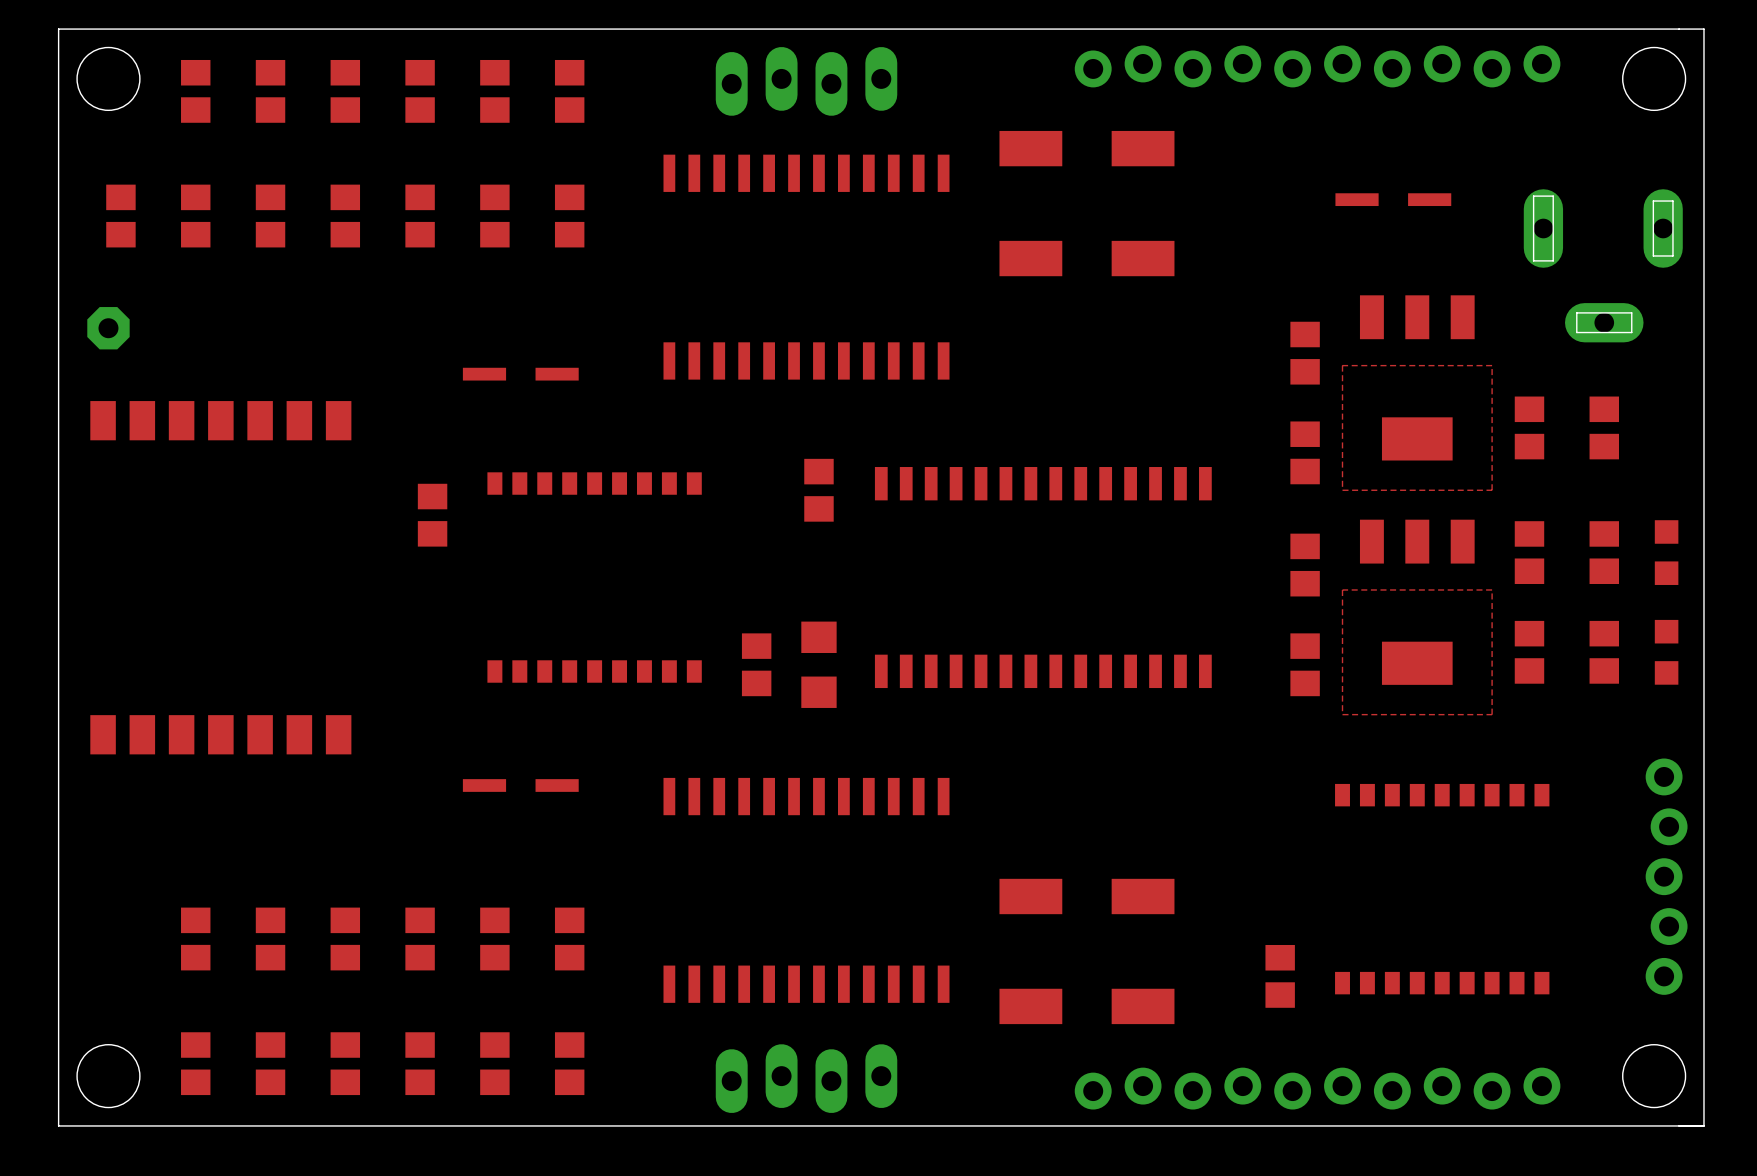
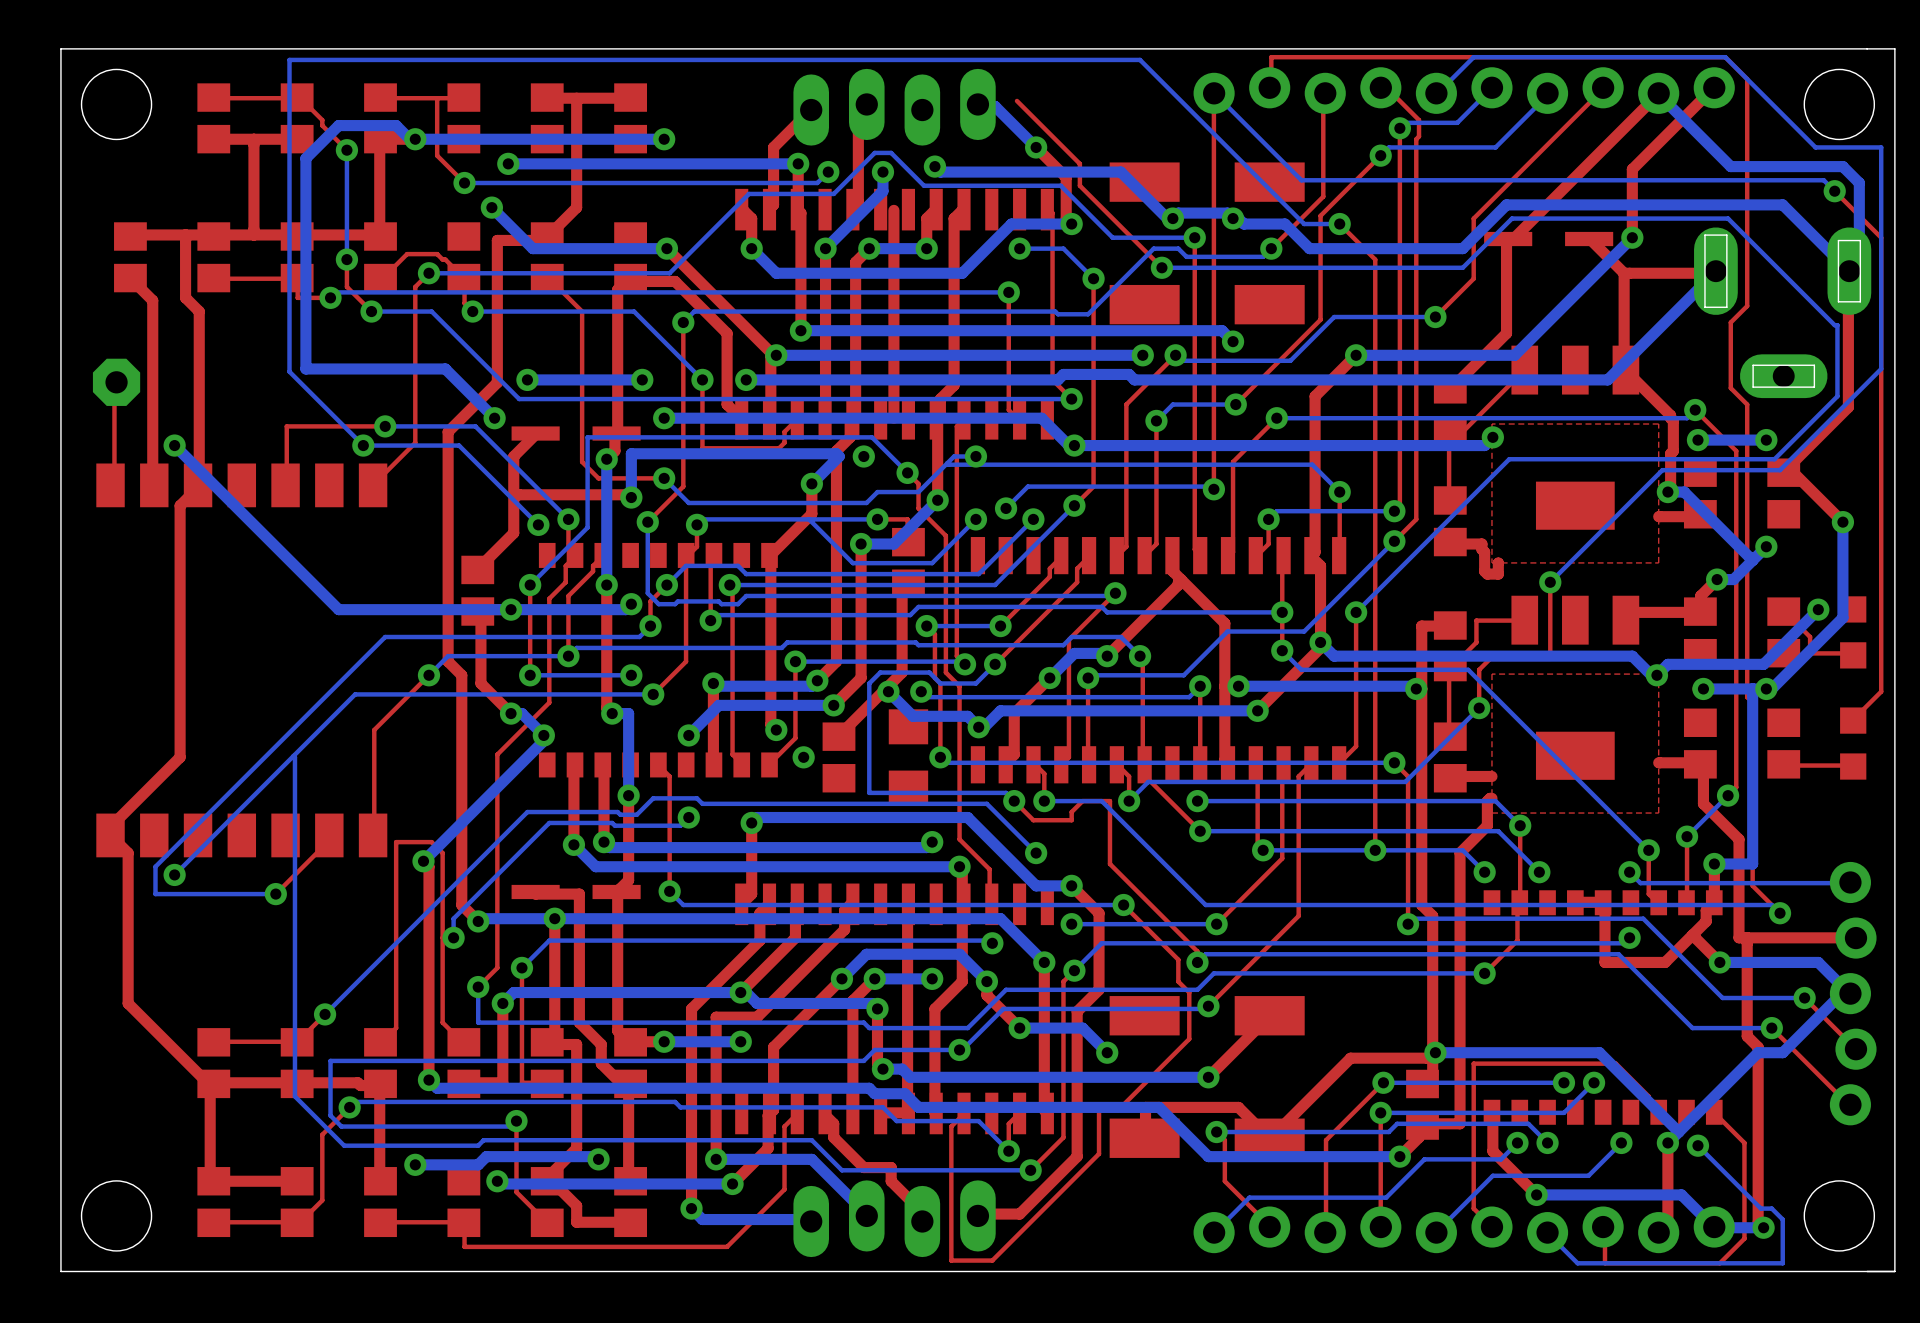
top track: none -> (1269, 87) (1271, 87) (1271, 57) (1725, 57) (1747, 79) (1747, 306) (1730, 322) (1730, 388) (1747, 404) (1747, 697) (1752, 702) (1752, 885) (1780, 913)
top track: none -> (1380, 87) (1388, 90) (1419, 120) (1419, 136) (1416, 139) (1416, 519) (1394, 541)
bottom track: none -> (1491, 87) (1457, 122) (1405, 122) (1399, 128)
top track: none -> (1603, 87) (1473, 218) (1473, 278) (1435, 317)
top track: none -> (1714, 87) (1632, 169) (1632, 237)
bottom track: none -> (1214, 93) (1301, 180) (1823, 180) (1834, 191)
top track: none -> (1214, 93) (1213, 489)
top track: none -> (1325, 93) (1323, 95) (1323, 196) (1271, 248)
bottom track: none -> (1436, 93) (1473, 57) (1725, 57) (1815, 147) (1881, 147) (1881, 368) (1780, 470) (1662, 470) (1550, 582)
bottom track: none -> (1547, 93) (1495, 147) (1388, 147) (1380, 155)
bottom track: none -> (1658, 93) (1730, 166) (1842, 166) (1859, 183) (1859, 267) (1848, 270) (1782, 204) (1506, 204) (1462, 248) (1309, 248) (1285, 224) (1243, 224) (1238, 218) (1233, 218) (1227, 213) (1178, 213) (1172, 218) (1167, 218) (1120, 172) (940, 172) (934, 166)
top track: none -> (1658, 93) (1512, 240) (1506, 240) (1506, 333) (1450, 389)
top track: none -> (213, 97) (294, 98) (297, 95) (322, 120) (322, 125) (346, 150)
top track: none -> (463, 97) (380, 97)
top track: none -> (630, 97) (547, 97)
top track: none -> (437, 98) (437, 155) (464, 183)
top track: none -> (576, 98) (576, 207) (543, 240) (497, 240) (497, 382) (448, 431) (448, 661) (461, 675) (461, 905) (478, 921)
top track: none -> (1016, 100) (1079, 163) (1079, 185) (1161, 267)
top track: none -> (866, 104) (858, 114) (858, 202) (852, 209)
bottom track: none -> (977, 104) (978, 106) (995, 106) (1036, 147)
top track: none -> (811, 110) (773, 147) (773, 204) (769, 209)
top track: none -> (1399, 128) (1399, 505) (1394, 511)
via: none -> (1399, 128)
top track: none -> (253, 139) (253, 234)
top track: none -> (297, 139) (213, 139)
top track: none -> (415, 139) (379, 139) (380, 236) (379, 234) (297, 234) (297, 236) (130, 234) (130, 236)
via: none -> (415, 139)
bottom track: none -> (664, 139) (409, 139) (396, 125) (338, 125) (305, 158) (305, 368) (445, 368) (494, 418)
via: none -> (664, 139)
top track: none -> (1036, 147) (1066, 177) (1066, 218) (1071, 224)
via: none -> (1036, 147)
bottom track: none -> (346, 150) (346, 259)
via: none -> (346, 150)
top track: none -> (1380, 155) (1320, 215) (1320, 319) (1235, 404)
via: none -> (1380, 155)
via: none -> (508, 163)
bottom track: none -> (798, 163) (508, 163)
top track: none -> (798, 163) (797, 209) (800, 213) (800, 330)
via: none -> (798, 163)
via: none -> (934, 166)
bottom track: none -> (828, 172) (817, 183) (464, 183)
via: none -> (828, 172)
bottom track: none -> (882, 172) (882, 191) (825, 248)
via: none -> (882, 172)
via: none -> (464, 183)
top track: none -> (1834, 191) (1881, 237) (1881, 691) (1853, 720)
via: none -> (1834, 191)
bottom track: none -> (491, 207) (532, 248) (666, 248)
via: none -> (491, 207)
top track: none -> (741, 209) (751, 218) (751, 248)
top track: none -> (893, 210) (893, 418)
top track: none -> (936, 209) (926, 218) (926, 248)
top track: none -> (964, 209) (954, 218) (954, 385) (940, 399) (940, 415) (936, 418) (937, 500)
top track: none -> (1047, 209) (1052, 213) (1052, 379) (1071, 399)
via: none -> (1172, 218)
via: none -> (1233, 218)
bottom track: none -> (1071, 224) (1011, 224) (962, 273) (776, 273) (751, 248)
via: none -> (1071, 224)
bottom track: none -> (1339, 224) (1304, 224) (1140, 59) (289, 59) (289, 371) (363, 445) (459, 445) (538, 524)
top track: none -> (1339, 224) (1375, 259) (1375, 850)
via: none -> (1339, 224)
top track: none -> (185, 234) (185, 297) (199, 311) (199, 483) (196, 489) (180, 505) (180, 757) (111, 825) (110, 835) (128, 853) (128, 1003) (210, 1085) (213, 1083)
bottom track: none -> (1194, 237) (1112, 237) (1060, 185) (923, 185) (891, 152) (874, 152) (833, 193) (748, 193) (669, 273) (428, 273)
top track: none -> (1194, 237) (1194, 549) (1200, 555)
via: none -> (1194, 237)
bottom track: none -> (1632, 237) (1514, 355) (1356, 355)
via: none -> (1632, 237)
top track: none -> (1589, 239) (1624, 273)
top track: none -> (666, 248) (770, 352) (769, 418)
via: none -> (666, 248)
via: none -> (751, 248)
top track: none -> (825, 248) (825, 418)
via: none -> (825, 248)
top track: none -> (869, 248) (855, 262) (855, 415) (850, 420) (850, 437) (836, 451) (836, 661) (817, 680)
via: none -> (869, 248)
bottom track: none -> (926, 248) (869, 248)
via: none -> (926, 248)
bottom track: none -> (1019, 248) (1063, 248) (1093, 278)
via: none -> (1019, 248)
bottom track: none -> (1271, 248) (1263, 256) (1186, 256) (1178, 248) (1153, 248) (1088, 314) (1058, 314) (1055, 311) (694, 311) (683, 322)
via: none -> (1271, 248)
top track: none -> (346, 259) (346, 286) (371, 311)
via: none -> (346, 259)
bottom track: none -> (1161, 267) (1462, 267) (1512, 218) (1728, 218) (1834, 325) (1837, 325) (1837, 396) (1774, 459) (1509, 459) (1356, 612)
via: none -> (1161, 267)
bottom track: none -> (1715, 271) (1607, 379) (1134, 379) (1129, 374) (1063, 374) (1058, 379) (746, 379)
top track: none -> (1715, 271) (1714, 273) (1624, 273)
top track: none -> (1849, 271) (1848, 407) (1783, 472) (1790, 470) (1842, 522)
top track: none -> (428, 273) (415, 286) (415, 442) (373, 485)
via: none -> (428, 273)
top track: none -> (1624, 273) (1624, 368) (1670, 415) (1673, 420) (1670, 489) (1667, 492)
top track: none -> (130, 278) (152, 300) (152, 483) (154, 485)
top track: none -> (213, 278) (297, 278) (297, 297) (330, 297)
top track: none -> (380, 278) (382, 278) (407, 254) (437, 254) (464, 278) (464, 303) (472, 311)
top track: none -> (547, 278) (582, 311) (582, 461) (598, 478) (664, 478)
top track: none -> (1093, 278) (1093, 486) (1074, 505)
via: none -> (1093, 278)
bottom track: none -> (1008, 292) (335, 292) (330, 297)
top track: none -> (1008, 292) (1008, 410) (1019, 418)
via: none -> (1008, 292)
via: none -> (330, 297)
bottom track: none -> (371, 311) (431, 311) (519, 399) (1071, 399)
via: none -> (371, 311)
bottom track: none -> (472, 311) (634, 311) (702, 379)
via: none -> (472, 311)
bottom track: none -> (1435, 317) (1334, 317) (1290, 360) (1181, 360) (1175, 355)
via: none -> (1435, 317)
top track: none -> (683, 322) (683, 486) (647, 522)
via: none -> (683, 322)
bottom track: none -> (800, 330) (1222, 330) (1233, 341)
via: none -> (800, 330)
via: none -> (1233, 341)
via: none -> (776, 355)
bottom track: none -> (1142, 355) (776, 355)
via: none -> (1142, 355)
top track: none -> (1175, 355) (1126, 404) (1126, 546) (1116, 555)
via: none -> (1175, 355)
top track: none -> (1356, 355) (1315, 396) (1315, 552) (1311, 555) (1320, 565) (1320, 647) (1257, 710)
via: none -> (1356, 355)
top track: none -> (1524, 370) (1449, 445)
via: none -> (527, 379)
bottom track: none -> (642, 379) (527, 379)
via: none -> (642, 379)
top track: none -> (702, 379) (702, 448) (779, 448) (784, 442) (784, 431) (797, 418)
via: none -> (702, 379)
via: none -> (746, 379)
top track: none -> (116, 382) (114, 382) (114, 481) (110, 485)
via: none -> (1071, 399)
bottom track: none -> (1235, 404) (1172, 404) (1156, 420)
via: none -> (1235, 404)
bottom track: none -> (1695, 410) (1687, 418) (1276, 418)
top track: none -> (1695, 410) (1736, 451) (1736, 787) (1728, 795)
via: none -> (1695, 410)
via: none -> (494, 418)
bottom track: none -> (664, 418) (1041, 418) (1068, 445) (1484, 445) (1492, 437)
via: none -> (664, 418)
top track: none -> (741, 418) (727, 404) (727, 333) (675, 281) (634, 281) (630, 278) (617, 289) (617, 431) (614, 437) (614, 451) (606, 459)
top track: none -> (964, 418) (956, 426) (956, 656) (965, 664)
top track: none -> (1276, 418) (1233, 461) (1233, 552) (1228, 555)
via: none -> (1276, 418)
top track: none -> (1156, 420) (1156, 544) (1144, 555)
via: none -> (1156, 420)
bottom track: none -> (385, 426) (475, 426) (568, 519)
top track: none -> (385, 426) (286, 426) (285, 485)
via: none -> (385, 426)
top track: none -> (1450, 430) (1450, 500)
top track: none -> (535, 433) (513, 456) (513, 533) (477, 569)
via: none -> (1492, 437)
via: none -> (1697, 440)
bottom track: none -> (1766, 440) (1697, 440)
via: none -> (1766, 440)
bottom track: none -> (174, 445) (338, 609) (625, 609) (631, 604)
via: none -> (174, 445)
via: none -> (363, 445)
via: none -> (1074, 445)
via: none -> (863, 456)
bottom track: none -> (975, 456) (954, 456) (918, 492) (877, 492) (866, 502) (688, 502) (664, 478)
via: none -> (975, 456)
bottom track: none -> (606, 459) (606, 585)
via: none -> (606, 459)
bottom track: none -> (947, 463) (1312, 464) (1339, 492)
bottom track: none -> (907, 472) (872, 437) (587, 437) (587, 527) (530, 585)
top track: none -> (907, 472) (918, 483) (918, 508) (945, 535) (945, 672) (959, 686) (959, 839) (989, 869) (989, 902) (991, 904)
via: none -> (907, 472)
via: none -> (664, 478)
bottom track: none -> (811, 483) (839, 456) (836, 453) (631, 453) (631, 497)
top track: none -> (811, 483) (811, 513) (769, 555) (770, 724) (776, 729)
via: none -> (811, 483)
bottom track: none -> (1213, 489) (1211, 486) (1027, 486) (1006, 508)
via: none -> (1213, 489)
top track: none -> (1339, 492) (1339, 555)
via: none -> (1339, 492)
bottom track: none -> (1667, 492) (1684, 492) (1752, 560)
via: none -> (1667, 492)
top track: none -> (513, 494) (631, 494) (631, 497)
via: none -> (631, 497)
bottom track: none -> (937, 500) (893, 544) (861, 544)
via: none -> (937, 500)
bottom track: none -> (1074, 505) (995, 585) (729, 585)
via: none -> (1074, 505)
via: none -> (1006, 508)
bottom track: none -> (1394, 511) (1276, 511) (1268, 519)
via: none -> (1394, 511)
top track: none -> (1700, 514) (1697, 516) (1658, 516)
top track: none -> (568, 519) (568, 549) (575, 555) (565, 565) (565, 582) (549, 598) (549, 702) (497, 754) (497, 967) (478, 987)
via: none -> (568, 519)
bottom track: none -> (877, 519) (702, 519) (697, 524)
top track: none -> (877, 519) (907, 519) (908, 542)
via: none -> (877, 519)
bottom track: none -> (975, 519) (932, 563) (852, 563) (809, 519)
via: none -> (975, 519)
bottom track: none -> (1033, 519) (978, 574) (746, 574) (738, 565) (686, 565) (666, 585)
via: none -> (1033, 519)
top track: none -> (1268, 519) (1268, 544) (1255, 555)
via: none -> (1268, 519)
bottom track: none -> (647, 522) (647, 593) (658, 604) (675, 604) (677, 601) (718, 601) (721, 604) (738, 604) (746, 595) (1112, 595) (1115, 593)
via: none -> (647, 522)
bottom track: none -> (1842, 522) (1842, 617) (1771, 688) (1703, 688)
via: none -> (1842, 522)
via: none -> (538, 524)
top track: none -> (697, 524) (697, 546) (686, 555) (686, 661) (653, 694)
via: none -> (697, 524)
bottom track: none -> (1394, 541) (1304, 631) (1227, 631) (1183, 675) (1090, 675) (1088, 678)
via: none -> (1394, 541)
top track: none -> (1450, 542) (1451, 544) (1481, 544) (1481, 549) (1484, 552) (1484, 571) (1487, 574) (1498, 574) (1498, 562)
top track: none -> (861, 544) (861, 678) (833, 705)
via: none -> (861, 544)
bottom track: none -> (1766, 546) (1733, 579) (1717, 579)
via: none -> (1766, 546)
top track: none -> (602, 555) (593, 565) (593, 571) (568, 595) (568, 656)
top track: none -> (713, 555) (710, 560) (710, 620)
top track: none -> (1061, 555) (1049, 568) (1049, 576) (1000, 626)
top track: none -> (1089, 555) (1077, 568) (1077, 582) (995, 664)
top track: none -> (1172, 555) (1172, 571) (1224, 623) (1224, 686)
top track: none -> (1283, 555) (1282, 650)
top track: none -> (1181, 579) (1178, 585) (1107, 656)
top track: none -> (1717, 579) (1700, 595) (1700, 611) (1626, 612) (1625, 620)
via: none -> (1717, 579)
top track: none -> (1550, 582) (1550, 658) (1490, 658) (1479, 669) (1479, 708)
via: none -> (1550, 582)
top track: none -> (908, 583) (902, 590) (902, 672) (838, 736)
top track: none -> (530, 585) (530, 675)
via: none -> (530, 585)
top track: none -> (606, 585) (606, 708) (612, 713)
via: none -> (606, 585)
top track: none -> (666, 585) (650, 601) (650, 626)
via: none -> (666, 585)
top track: none -> (729, 585) (732, 587) (732, 754) (741, 764)
via: none -> (729, 585)
top track: none -> (1115, 593) (1068, 639) (1068, 757) (1061, 764)
via: none -> (1115, 593)
via: none -> (631, 604)
top track: none -> (511, 609) (480, 609) (477, 611) (480, 615) (480, 683) (511, 713)
via: none -> (511, 609)
bottom track: none -> (1818, 609) (1763, 664) (1667, 664) (1656, 675) (1651, 675) (1632, 656) (1334, 656) (1320, 642)
via: none -> (1818, 609)
top track: none -> (1783, 611) (1810, 637) (1810, 653) (1851, 653) (1853, 655)
bottom track: none -> (1282, 612) (1107, 612) (1101, 606) (918, 606) (910, 615) (716, 615) (710, 620)
via: none -> (1282, 612)
top track: none -> (1356, 612) (1356, 746) (1339, 764)
via: none -> (1356, 612)
via: none -> (710, 620)
top track: none -> (1524, 620) (1476, 620) (1476, 642) (1451, 667) (1449, 667) (1450, 736)
bottom track: none -> (650, 626) (639, 637) (385, 637) (155, 866) (155, 894) (275, 894)
via: none -> (650, 626)
top track: none -> (926, 626) (934, 634) (934, 678) (940, 683) (940, 757)
via: none -> (926, 626)
bottom track: none -> (1000, 626) (926, 626)
via: none -> (1000, 626)
top track: none -> (1450, 625) (1421, 626) (1421, 688)
via: none -> (1320, 642)
bottom track: none -> (1282, 650) (1301, 669) (1468, 669) (1648, 850)
via: none -> (1282, 650)
via: none -> (568, 656)
bottom track: none -> (1107, 656) (1104, 653) (1074, 653) (1049, 678)
via: none -> (1107, 656)
bottom track: none -> (1140, 656) (1120, 637) (1071, 637) (1063, 645) (787, 642) (781, 647) (576, 647) (568, 656) (448, 656) (428, 675)
top track: none -> (1140, 656) (1142, 658) (1142, 762) (1145, 765) (1145, 776) (1200, 831)
via: none -> (1140, 656)
bottom track: none -> (795, 661) (962, 661) (965, 664)
top track: none -> (795, 661) (795, 738) (769, 764)
via: none -> (795, 661)
via: none -> (965, 664)
bottom track: none -> (995, 664) (975, 683) (940, 683) (929, 672) (880, 672) (869, 683) (869, 792) (1006, 792) (1014, 801)
via: none -> (995, 664)
top track: none -> (428, 675) (374, 729) (373, 835)
via: none -> (428, 675)
via: none -> (530, 675)
bottom track: none -> (631, 675) (530, 675)
via: none -> (631, 675)
via: none -> (1656, 675)
top track: none -> (1049, 678) (1014, 713) (1014, 754) (1005, 764)
via: none -> (1049, 678)
top track: none -> (1088, 678) (1089, 764)
via: none -> (1088, 678)
bottom track: none -> (817, 680) (811, 686) (716, 686) (713, 683)
via: none -> (817, 680)
top track: none -> (713, 683) (713, 764)
via: none -> (713, 683)
bottom track: none -> (1200, 686) (1189, 697) (926, 697) (921, 691)
top track: none -> (1200, 686) (1200, 764)
via: none -> (1200, 686)
top track: none -> (1224, 686) (1224, 760) (1228, 764)
bottom track: none -> (1238, 686) (1413, 686) (1416, 688)
via: none -> (1238, 686)
via: none -> (1416, 688)
top track: none -> (1421, 688) (1421, 905) (1432, 915) (1432, 1074) (1422, 1083)
via: none -> (1703, 688)
bottom track: none -> (1752, 688) (1752, 864) (1714, 864)
via: none -> (1766, 688)
bottom track: none -> (888, 691) (913, 716) (967, 716) (978, 727) (984, 727) (1000, 710) (1257, 710)
via: none -> (888, 691)
via: none -> (921, 691)
bottom track: none -> (653, 694) (355, 694) (174, 874)
via: none -> (653, 694)
bottom track: none -> (833, 705) (718, 705) (688, 735)
via: none -> (833, 705)
bottom track: none -> (1479, 708) (1405, 781) (1148, 781) (1129, 801)
via: none -> (1479, 708)
via: none -> (1257, 710)
bottom track: none -> (511, 713) (521, 713) (543, 735) (543, 740) (423, 861)
via: none -> (511, 713)
bottom track: none -> (612, 713) (628, 713) (628, 795)
via: none -> (612, 713)
via: none -> (978, 727)
via: none -> (776, 729)
via: none -> (543, 735)
via: none -> (688, 735)
bottom track: none -> (293, 755) (294, 1096) (344, 1145) (478, 1145) (483, 1140) (811, 1140) (841, 1170) (1030, 1170)
via: none -> (803, 757)
bottom track: none -> (940, 757) (945, 762) (1394, 762)
via: none -> (940, 757)
top track: none -> (1394, 762) (1408, 776) (1408, 924)
via: none -> (1394, 762)
top track: none -> (1658, 762) (1700, 764) (1703, 768) (1703, 803) (1739, 839) (1739, 937) (1855, 938)
top track: none -> (1783, 764) (1853, 766)
top track: none -> (575, 764) (573, 844)
top track: none -> (602, 764) (604, 842)
top track: none -> (658, 764) (669, 776) (669, 891)
top track: none -> (1033, 764) (1044, 773) (1044, 801)
top track: none -> (1116, 764) (1129, 776) (1129, 801)
top track: none -> (1255, 764) (1257, 765) (1257, 844) (1263, 850)
top track: none -> (1283, 764) (1282, 858) (1216, 924)
top track: none -> (1311, 764) (1298, 776) (1298, 915) (1208, 1006)
top track: none -> (1491, 776) (1451, 776) (1450, 778)
top track: none -> (628, 795) (628, 880) (616, 892) (617, 1030) (630, 1042) (664, 1041)
via: none -> (628, 795)
bottom track: none -> (1728, 795) (1687, 836)
via: none -> (1728, 795)
top track: none -> (1491, 798) (1487, 801) (1487, 825) (1460, 853) (1460, 1123) (1424, 1123) (1419, 1129) (1419, 1137) (1399, 1156)
top track: none -> (1014, 801) (1033, 820) (1071, 820) (1071, 812) (1082, 801) (1109, 801) (1109, 864) (1197, 951) (1197, 962)
via: none -> (1014, 801)
bottom track: none -> (1044, 801) (1101, 801) (1205, 905) (1771, 905) (1780, 913)
via: none -> (1044, 801)
via: none -> (1129, 801)
bottom track: none -> (1197, 801) (1495, 801) (1520, 825)
via: none -> (1197, 801)
bottom track: none -> (688, 817) (680, 825) (549, 822) (453, 918) (453, 937)
via: none -> (688, 817)
bottom track: none -> (751, 822) (757, 817) (967, 817) (1036, 885) (1071, 885)
top track: none -> (751, 822) (751, 894) (741, 904)
via: none -> (751, 822)
top track: none -> (1520, 825) (1520, 902) (1517, 905) (1517, 940) (1484, 973)
via: none -> (1520, 825)
bottom track: none -> (1200, 831) (1498, 831) (1539, 872)
via: none -> (1200, 831)
top track: none -> (329, 835) (327, 842) (275, 894)
top track: none -> (1687, 836) (1686, 902)
via: none -> (1687, 836)
via: none -> (604, 842)
bottom track: none -> (932, 842) (926, 847) (609, 847) (604, 842)
via: none -> (932, 842)
bottom track: none -> (573, 844) (595, 866) (959, 866)
via: none -> (573, 844)
bottom track: none -> (1263, 850) (1462, 850) (1484, 872)
via: none -> (1263, 850)
via: none -> (1375, 850)
top track: none -> (1648, 850) (1648, 894) (1658, 902)
via: none -> (1648, 850)
bottom track: none -> (1036, 853) (986, 803) (702, 803) (697, 798) (653, 798) (636, 814) (620, 814) (617, 812) (527, 812) (325, 1014)
via: none -> (1036, 853)
top track: none -> (423, 861) (428, 866) (428, 1080)
via: none -> (423, 861)
top track: none -> (1714, 864) (1714, 902) (1706, 910) (1706, 921) (1665, 962) (1604, 962) (1604, 905) (1599, 902) (1575, 902)
via: none -> (1714, 864)
top track: none -> (959, 866) (962, 869) (962, 902) (964, 904) (962, 907) (962, 981) (934, 1008) (936, 1113)
via: none -> (959, 866)
via: none -> (1484, 872)
via: none -> (1539, 872)
bottom track: none -> (1629, 872) (1640, 883) (1850, 882)
via: none -> (1629, 872)
via: none -> (174, 874)
top track: none -> (1071, 885) (1099, 913) (1099, 989) (1077, 1011) (1077, 1156) (1019, 1214) (978, 1214) (977, 1215)
via: none -> (1071, 885)
bottom track: none -> (669, 891) (683, 905) (1123, 905)
via: none -> (669, 891)
top track: none -> (535, 892) (535, 894) (579, 894) (579, 1022) (601, 1044) (601, 1063) (623, 1085) (630, 1083) (628, 1085) (628, 1181) (630, 1181)
via: none -> (275, 894)
top track: none -> (769, 904) (759, 913) (759, 940) (691, 1008) (691, 1208)
top track: none -> (797, 904) (795, 905) (795, 937) (740, 992)
top track: none -> (852, 904) (844, 910) (844, 929) (757, 1017) (716, 1017) (716, 1159)
top track: none -> (908, 904) (908, 1113) (880, 1113)
top track: none -> (1123, 905) (1178, 959) (1178, 981) (1189, 992) (1189, 1039) (1118, 1110) (1099, 1110) (1099, 1153) (992, 1260) (951, 1260) (951, 1126) (964, 1113)
via: none -> (1123, 905)
via: none -> (1780, 913)
top track: none -> (554, 918) (554, 1039) (547, 1042) (549, 1044) (576, 1044) (576, 1148) (552, 1173) (547, 1181) (552, 1181) (576, 1205) (576, 1222) (630, 1222)
via: none -> (554, 918)
bottom track: none -> (478, 921) (480, 918) (1000, 918) (1044, 962)
via: none -> (478, 921)
via: none -> (1071, 924)
bottom track: none -> (1216, 924) (1071, 924)
via: none -> (1216, 924)
bottom track: none -> (1408, 924) (1413, 918) (1643, 918) (1722, 998) (1804, 998)
via: none -> (1408, 924)
top track: none -> (1692, 935) (1719, 962)
via: none -> (453, 937)
bottom track: none -> (1629, 937) (1624, 943) (1101, 943) (1074, 970)
via: none -> (1629, 937)
top track: none -> (1747, 937) (1747, 1036) (1758, 1047) (1758, 1222) (1763, 1227)
bottom track: none -> (992, 943) (989, 940) (549, 940) (521, 967)
via: none -> (992, 943)
top track: none -> (1044, 962) (1044, 1110) (1047, 1113)
via: none -> (1044, 962)
bottom track: none -> (1197, 962) (1205, 954) (1618, 954) (1692, 1028) (1771, 1028)
via: none -> (1197, 962)
bottom track: none -> (1719, 962) (1818, 962) (1850, 993) (1842, 992) (1782, 1052) (1758, 1052) (1667, 1142)
via: none -> (1719, 962)
top track: none -> (521, 967) (521, 1082) (547, 1083)
via: none -> (521, 967)
top track: none -> (1074, 970) (1063, 981) (1063, 1137) (1030, 1170)
via: none -> (1074, 970)
bottom track: none -> (1484, 973) (1213, 973) (1197, 989) (1006, 989) (967, 1028) (869, 1028) (863, 1022) (478, 1022) (478, 987)
via: none -> (1484, 973)
bottom track: none -> (841, 978) (866, 954) (959, 954) (986, 981)
top track: none -> (841, 978) (773, 1047) (773, 1110) (768, 1115) (768, 1148) (732, 1183)
via: none -> (841, 978)
top track: none -> (874, 978) (852, 1000) (852, 1113)
via: none -> (874, 978)
bottom track: none -> (932, 978) (874, 978)
via: none -> (932, 978)
top track: none -> (986, 981) (986, 995) (1019, 1028)
via: none -> (986, 981)
via: none -> (478, 987)
via: none -> (740, 992)
top track: none -> (1804, 998) (1855, 1049)
via: none -> (1804, 998)
bottom track: none -> (502, 1003) (513, 992) (746, 992) (757, 1003) (872, 1003) (877, 1008)
top track: none -> (502, 1003) (502, 1082) (463, 1083)
via: none -> (502, 1003)
bottom track: none -> (1208, 1006) (1205, 1008) (1003, 1008) (962, 1049) (874, 1049) (863, 1060) (330, 1060) (330, 1115) (341, 1126) (511, 1126) (516, 1121)
via: none -> (1208, 1006)
top track: none -> (877, 1008) (877, 1063) (882, 1069)
via: none -> (877, 1008)
top track: none -> (325, 1014) (297, 1042) (213, 1042)
via: none -> (325, 1014)
top track: none -> (1269, 1015) (1208, 1077)
bottom track: none -> (1019, 1028) (1082, 1028) (1107, 1052)
via: none -> (1019, 1028)
top track: none -> (1771, 1028) (1850, 1104)
via: none -> (1771, 1028)
via: none -> (664, 1041)
bottom track: none -> (740, 1041) (664, 1041)
via: none -> (740, 1041)
top track: none -> (463, 1042) (442, 1022) (442, 853) (431, 842) (396, 842) (396, 1028) (380, 1042)
via: none -> (959, 1049)
via: none -> (1107, 1052)
bottom track: none -> (1435, 1052) (1599, 1052) (1678, 1132)
via: none -> (1435, 1052)
top track: none -> (1432, 1058) (1350, 1058) (1269, 1138) (1238, 1107) (1145, 1107) (1144, 1138)
bottom track: none -> (882, 1069) (902, 1069) (910, 1077) (1208, 1077)
via: none -> (882, 1069)
via: none -> (1208, 1077)
bottom track: none -> (428, 1080) (437, 1088) (869, 1088) (874, 1093) (904, 1093) (918, 1107) (1159, 1107) (1208, 1156) (1399, 1156)
via: none -> (428, 1080)
top track: none -> (1383, 1082) (1326, 1140) (1325, 1232)
via: none -> (1383, 1082)
bottom track: none -> (1563, 1082) (1383, 1082)
via: none -> (1563, 1082)
bottom track: none -> (1594, 1082) (1563, 1112) (1380, 1112)
via: none -> (1594, 1082)
top track: none -> (213, 1083) (357, 1082) (360, 1085) (380, 1083) (380, 1181)
top track: none -> (213, 1083) (210, 1090) (210, 1173) (213, 1181) (297, 1181)
bottom track: none -> (349, 1107) (355, 1101) (675, 1101) (680, 1107) (882, 1107) (896, 1121) (978, 1121) (1008, 1151)
top track: none -> (349, 1107) (322, 1134) (322, 1200) (297, 1225) (294, 1222) (213, 1222)
via: none -> (349, 1107)
top track: none -> (1380, 1112) (1380, 1227)
via: none -> (1380, 1112)
top track: none -> (1491, 1112) (1492, 1151) (1536, 1194)
top track: none -> (1658, 1112) (1648, 1101) (1648, 1096) (1615, 1063) (1473, 1063) (1473, 1208) (1491, 1227)
top track: none -> (1714, 1112) (1744, 1142) (1744, 1238) (1719, 1263) (1604, 1263) (1604, 1227) (1603, 1227)
top track: none -> (797, 1113) (784, 1126) (784, 1189) (727, 1246) (464, 1246) (463, 1222) (380, 1222)
top track: none -> (825, 1113) (833, 1123) (833, 1137) (863, 1167) (891, 1167) (891, 1181) (921, 1211) (922, 1221)
top track: none -> (1019, 1113) (1008, 1123) (1008, 1151)
top track: none -> (516, 1121) (516, 1192) (547, 1222)
via: none -> (516, 1121)
bottom track: none -> (1216, 1132) (1388, 1132) (1397, 1123) (1528, 1123) (1547, 1142)
top track: none -> (1216, 1132) (1224, 1140) (1224, 1181) (1269, 1227)
via: none -> (1216, 1132)
bottom track: none -> (1517, 1142) (1501, 1159) (1424, 1159) (1386, 1197) (1249, 1197) (1214, 1232)
via: none -> (1517, 1142)
via: none -> (1547, 1142)
bottom track: none -> (1621, 1142) (1588, 1175) (1492, 1175) (1436, 1232)
via: none -> (1621, 1142)
top track: none -> (1667, 1142) (1667, 1222) (1658, 1232)
via: none -> (1667, 1142)
bottom track: none -> (1697, 1145) (1760, 1208) (1771, 1208) (1782, 1219) (1782, 1263) (1577, 1263) (1547, 1232)
via: none -> (1697, 1145)
via: none -> (1008, 1151)
via: none -> (1399, 1156)
bottom track: none -> (598, 1159) (595, 1156) (486, 1156) (478, 1164) (415, 1164)
via: none -> (598, 1159)
bottom track: none -> (716, 1159) (811, 1159) (866, 1215)
via: none -> (716, 1159)
via: none -> (415, 1164)
via: none -> (1030, 1170)
bottom track: none -> (497, 1181) (500, 1183) (732, 1183)
via: none -> (497, 1181)
via: none -> (732, 1183)
bottom track: none -> (1536, 1194) (1681, 1194) (1714, 1227) (1763, 1227)
via: none -> (1536, 1194)
bottom track: none -> (691, 1208) (702, 1219) (809, 1219) (811, 1221)
via: none -> (691, 1208)
via: none -> (1763, 1227)

